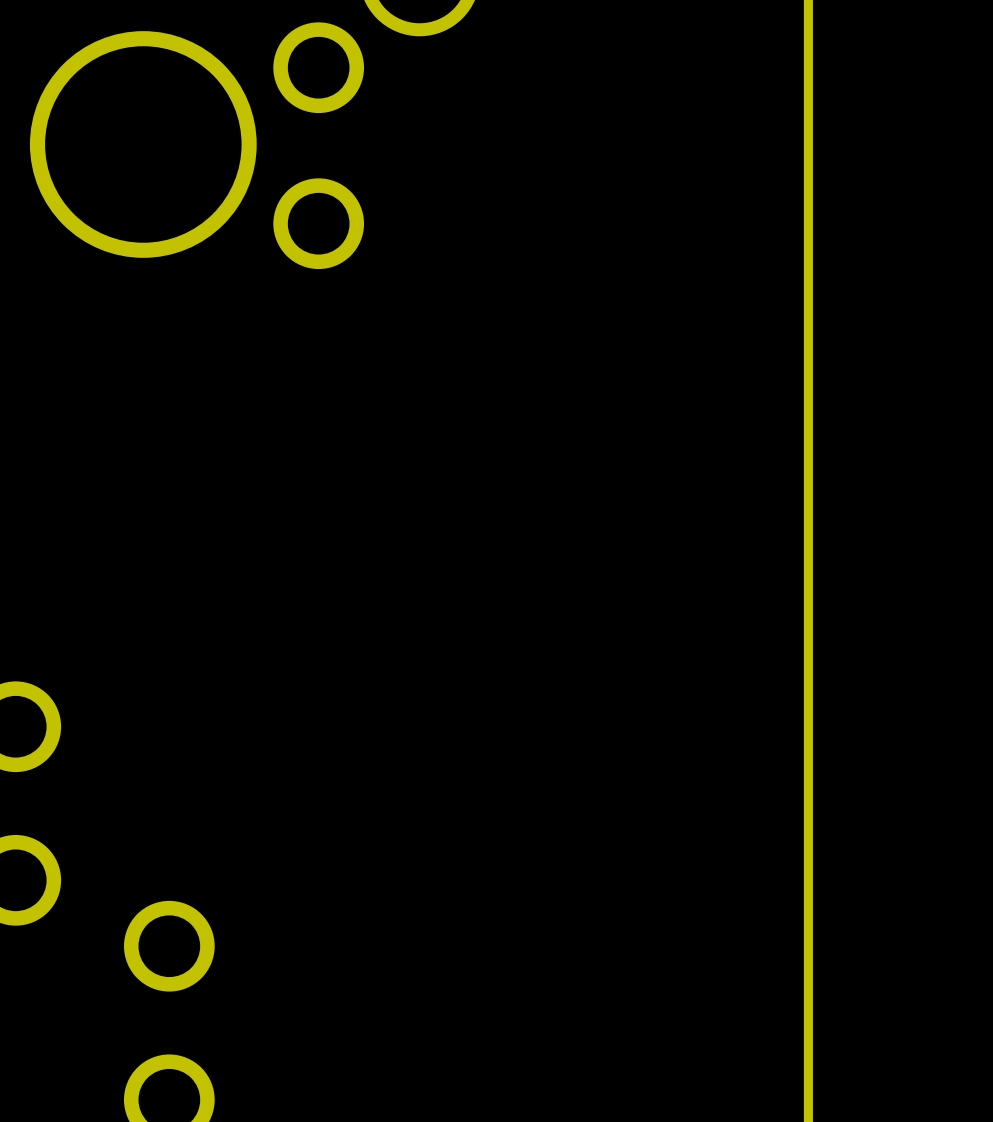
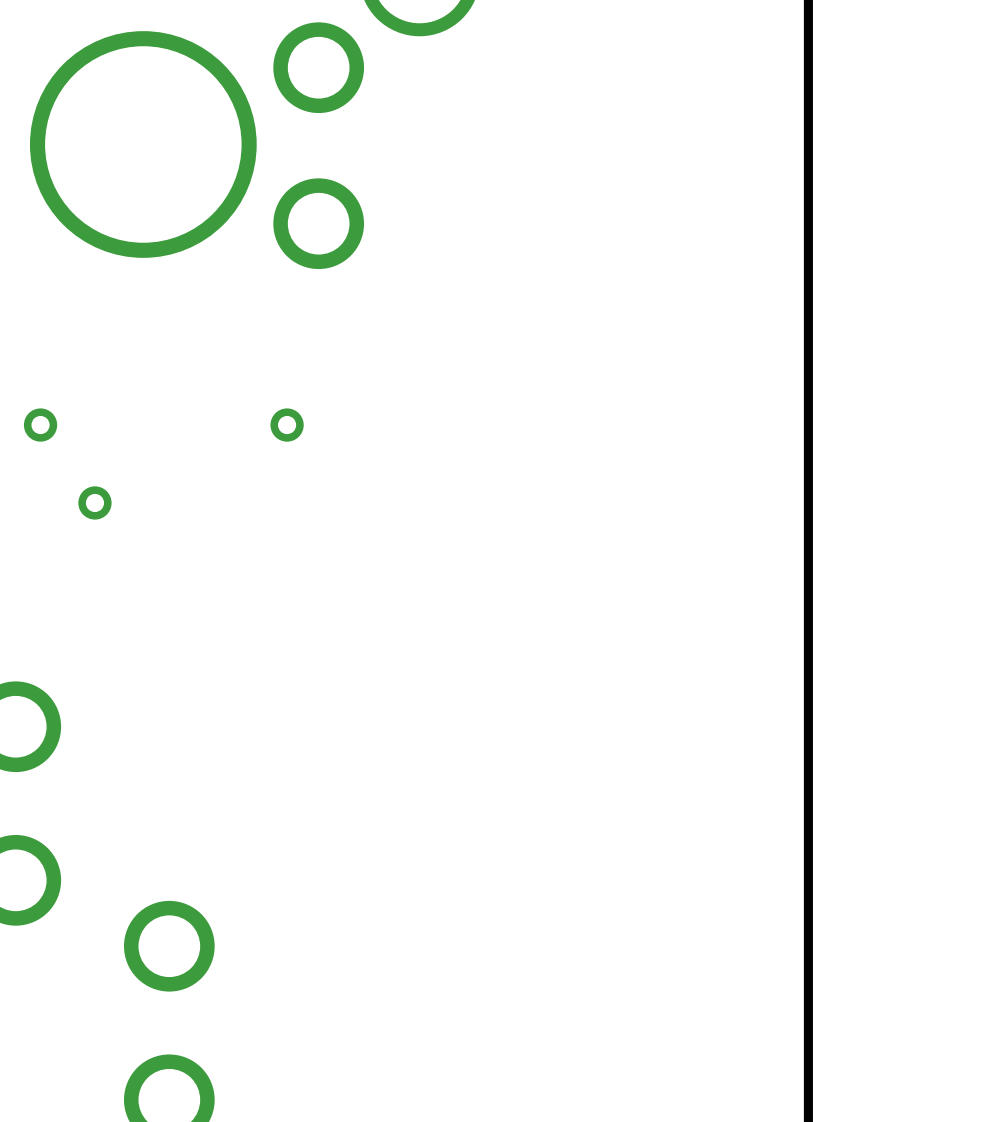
via: none -> (40, 425)
via: none -> (287, 425)
via: none -> (94, 502)

